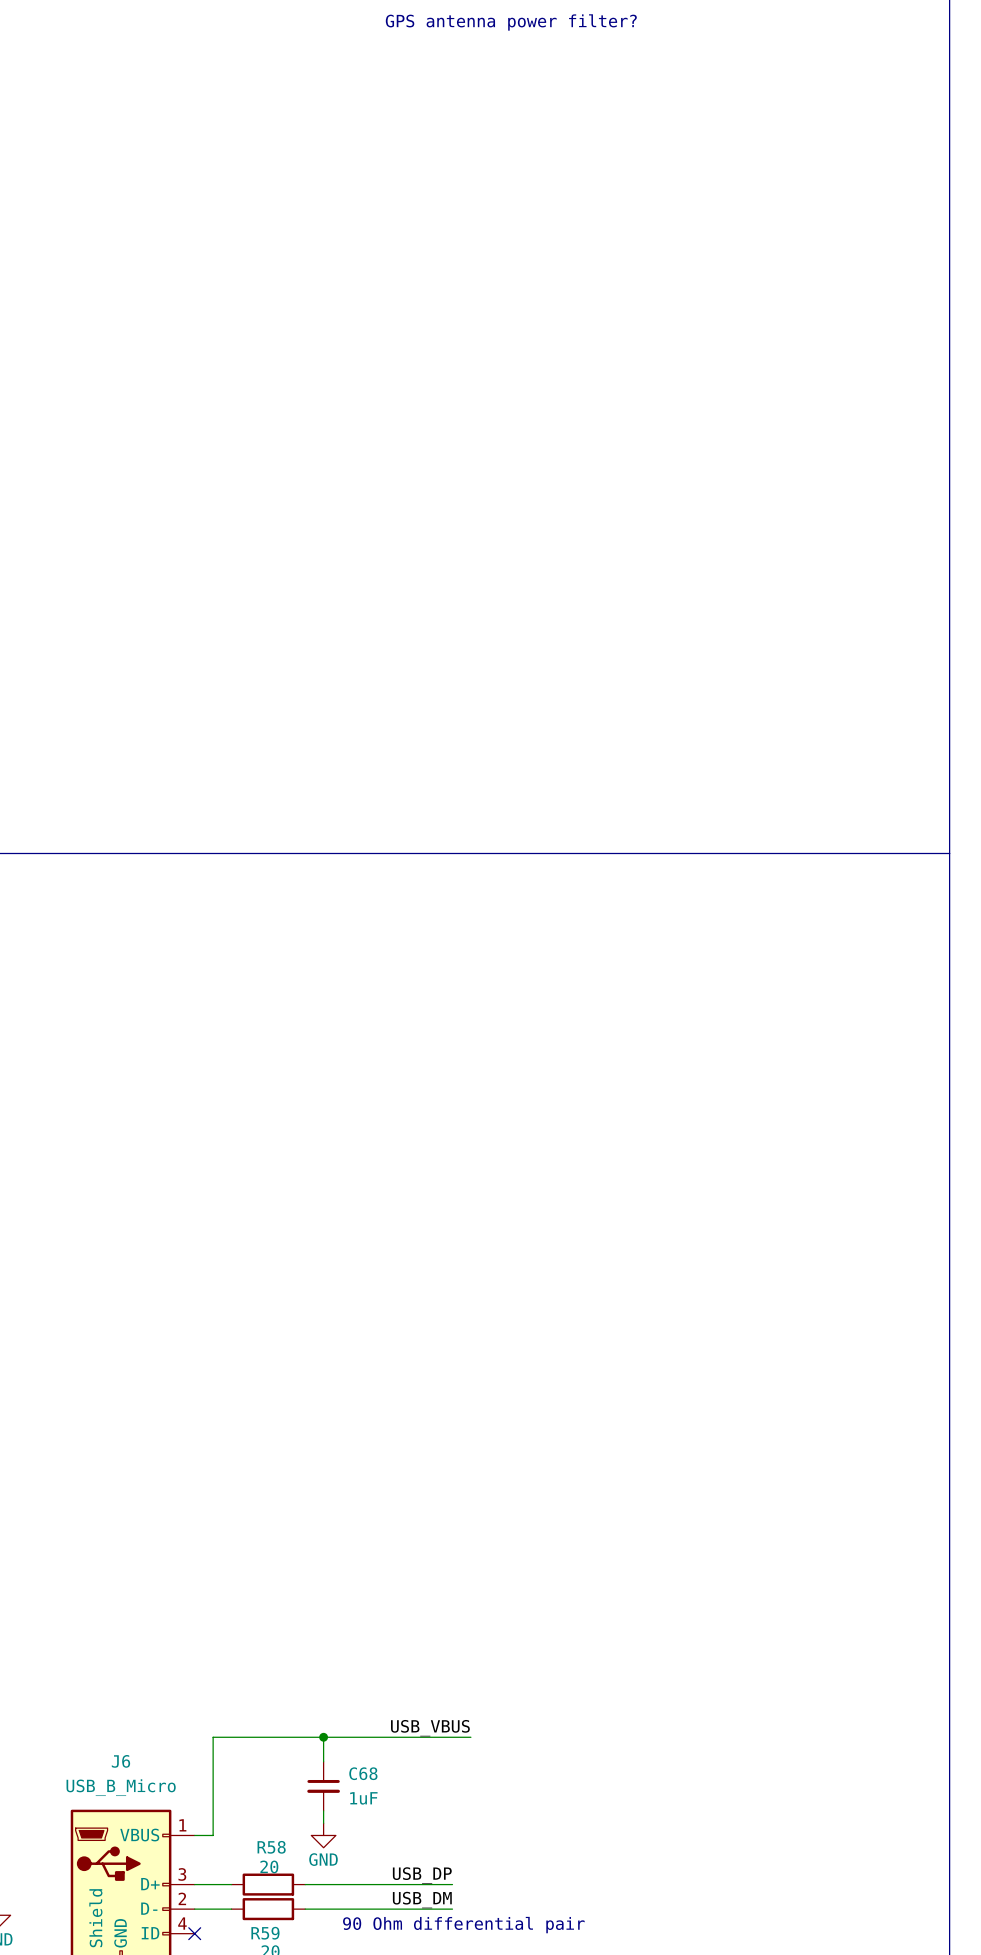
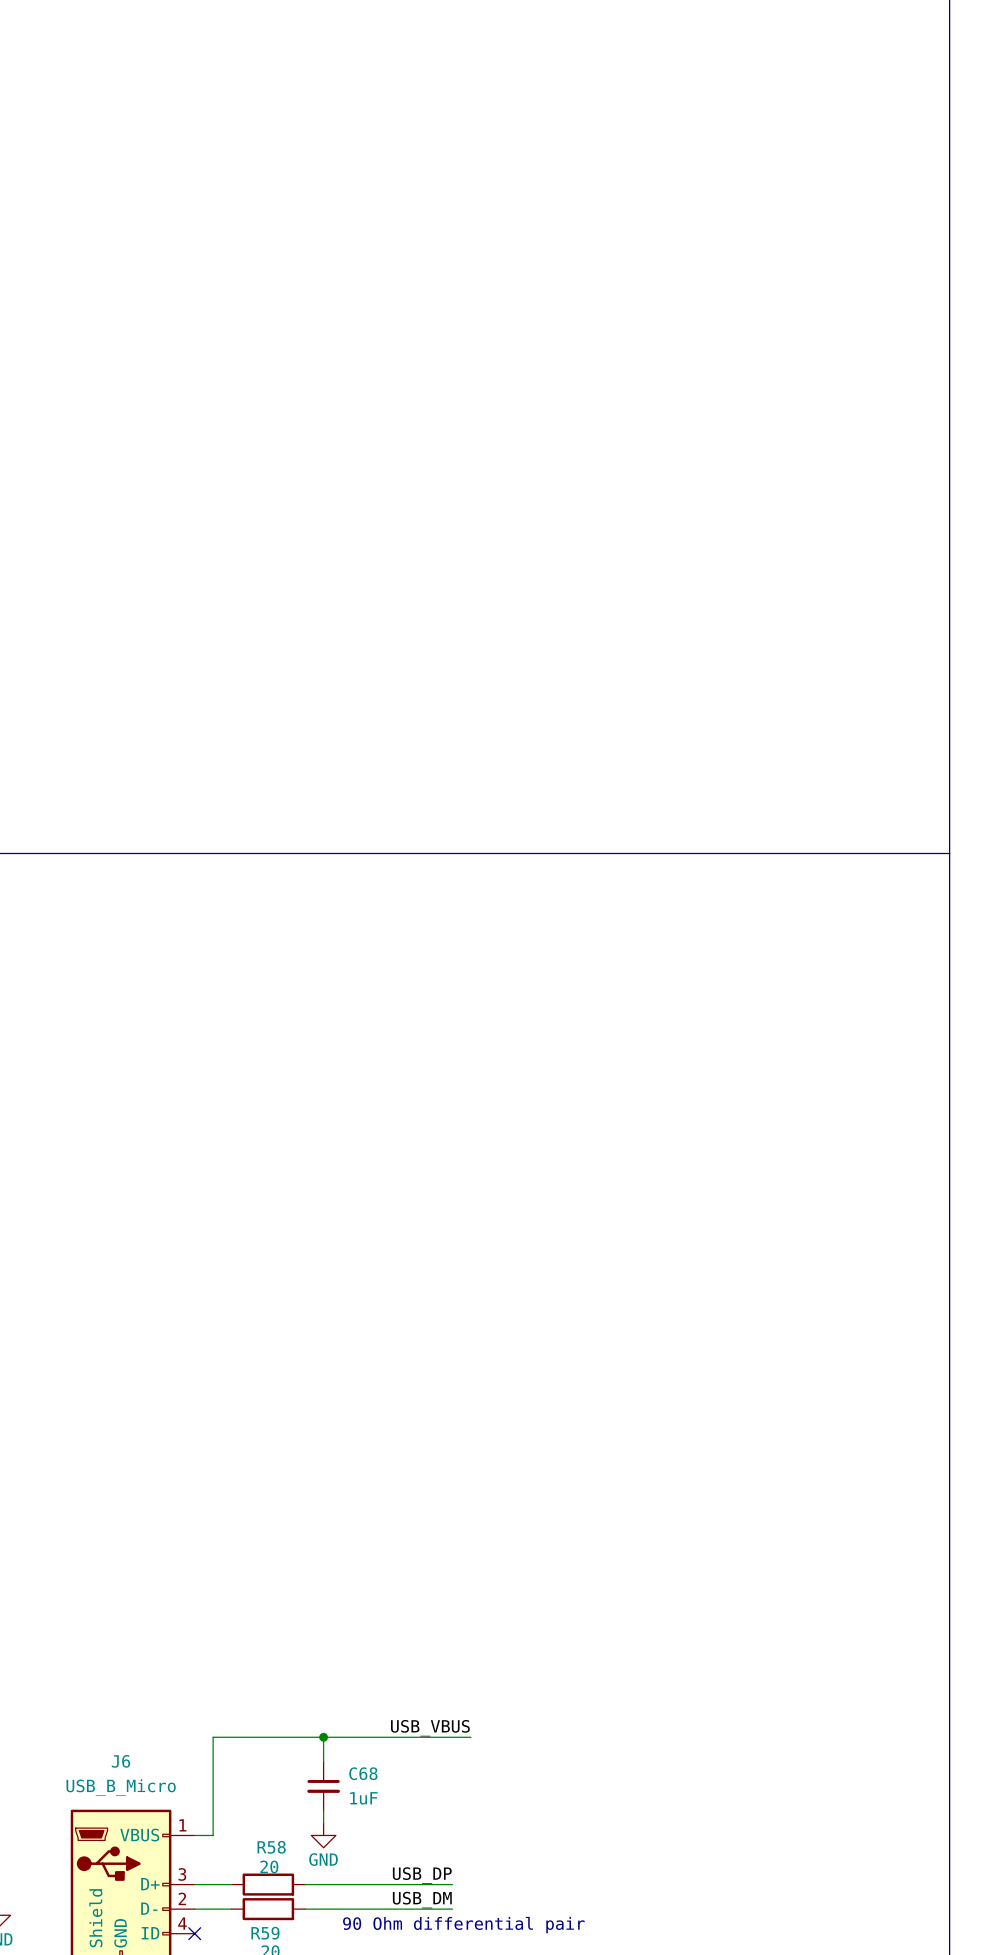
text: GPS antenna power filter? (511, 22) -> none

